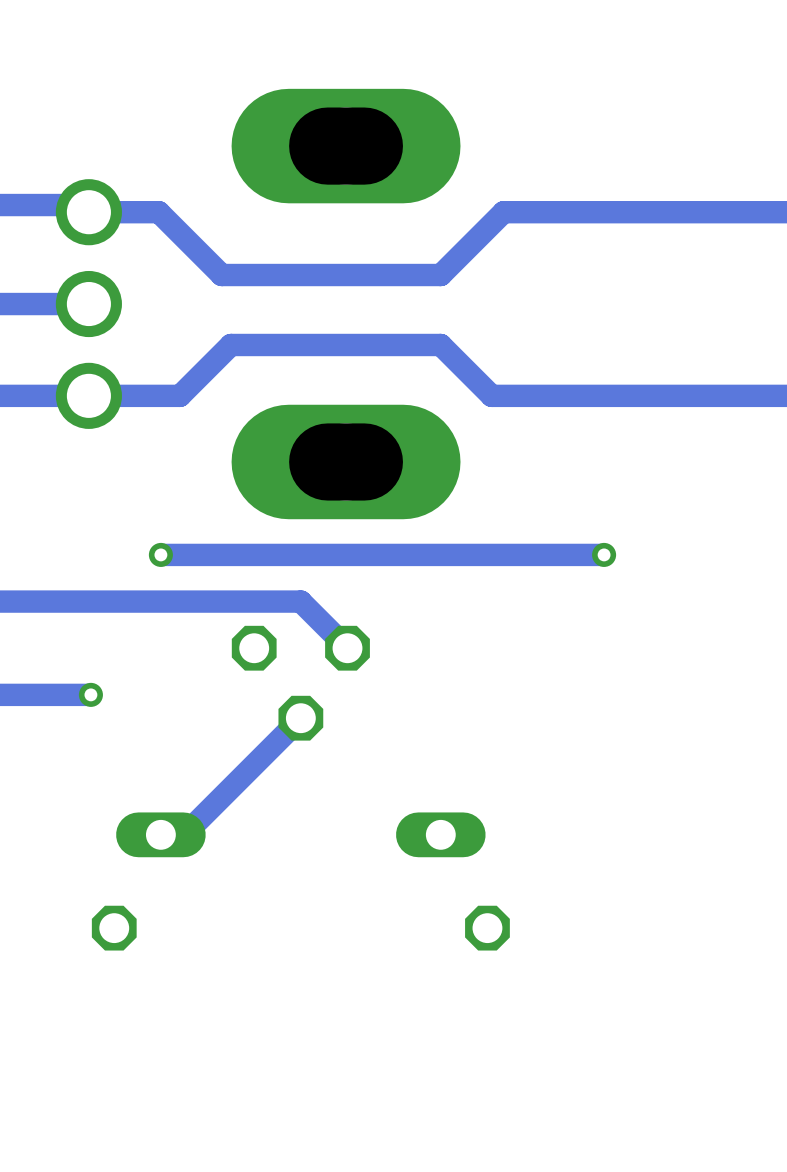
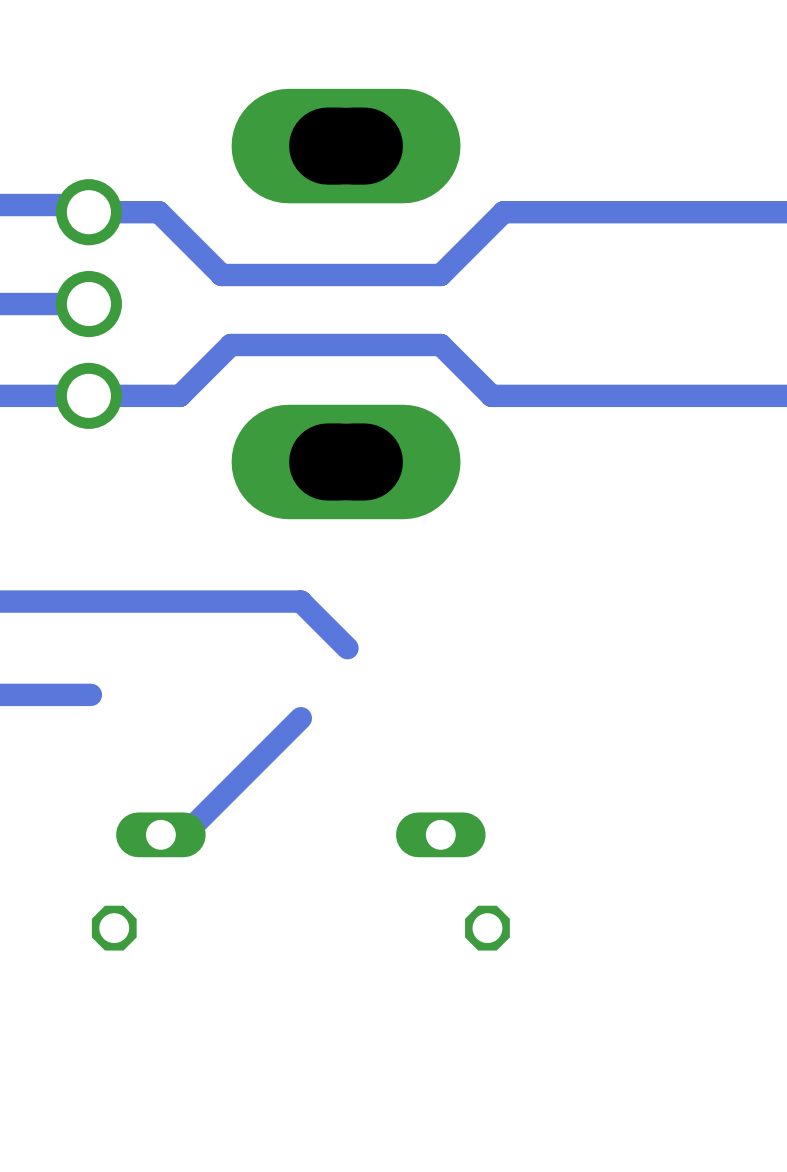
via: (160, 554) -> none
track: (604, 554) (160, 554) -> none
via: (604, 554) -> none
part: (300, 683) -> none
via: (90, 694) -> none

